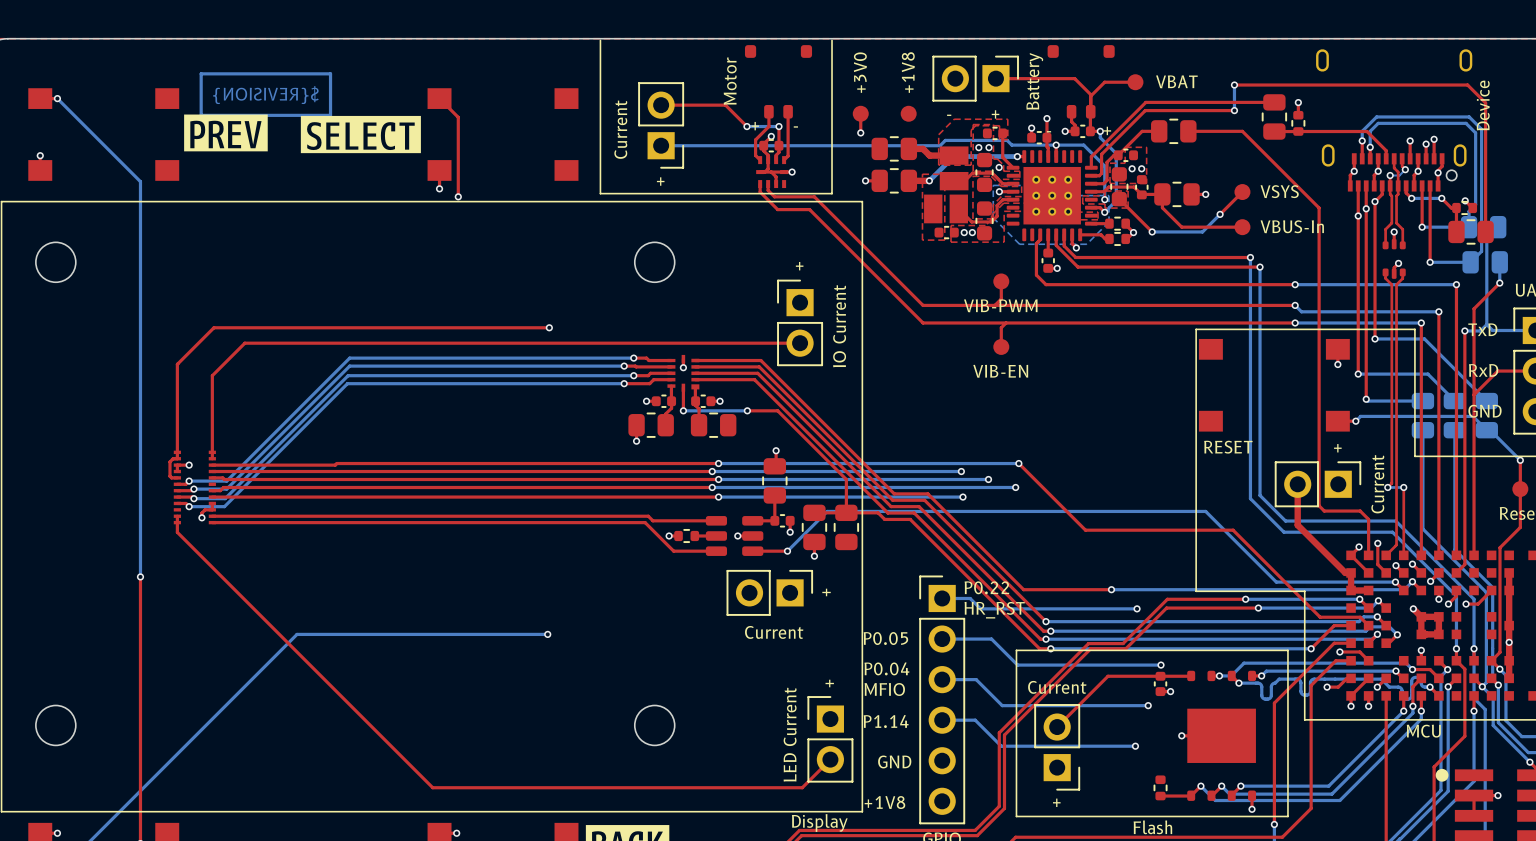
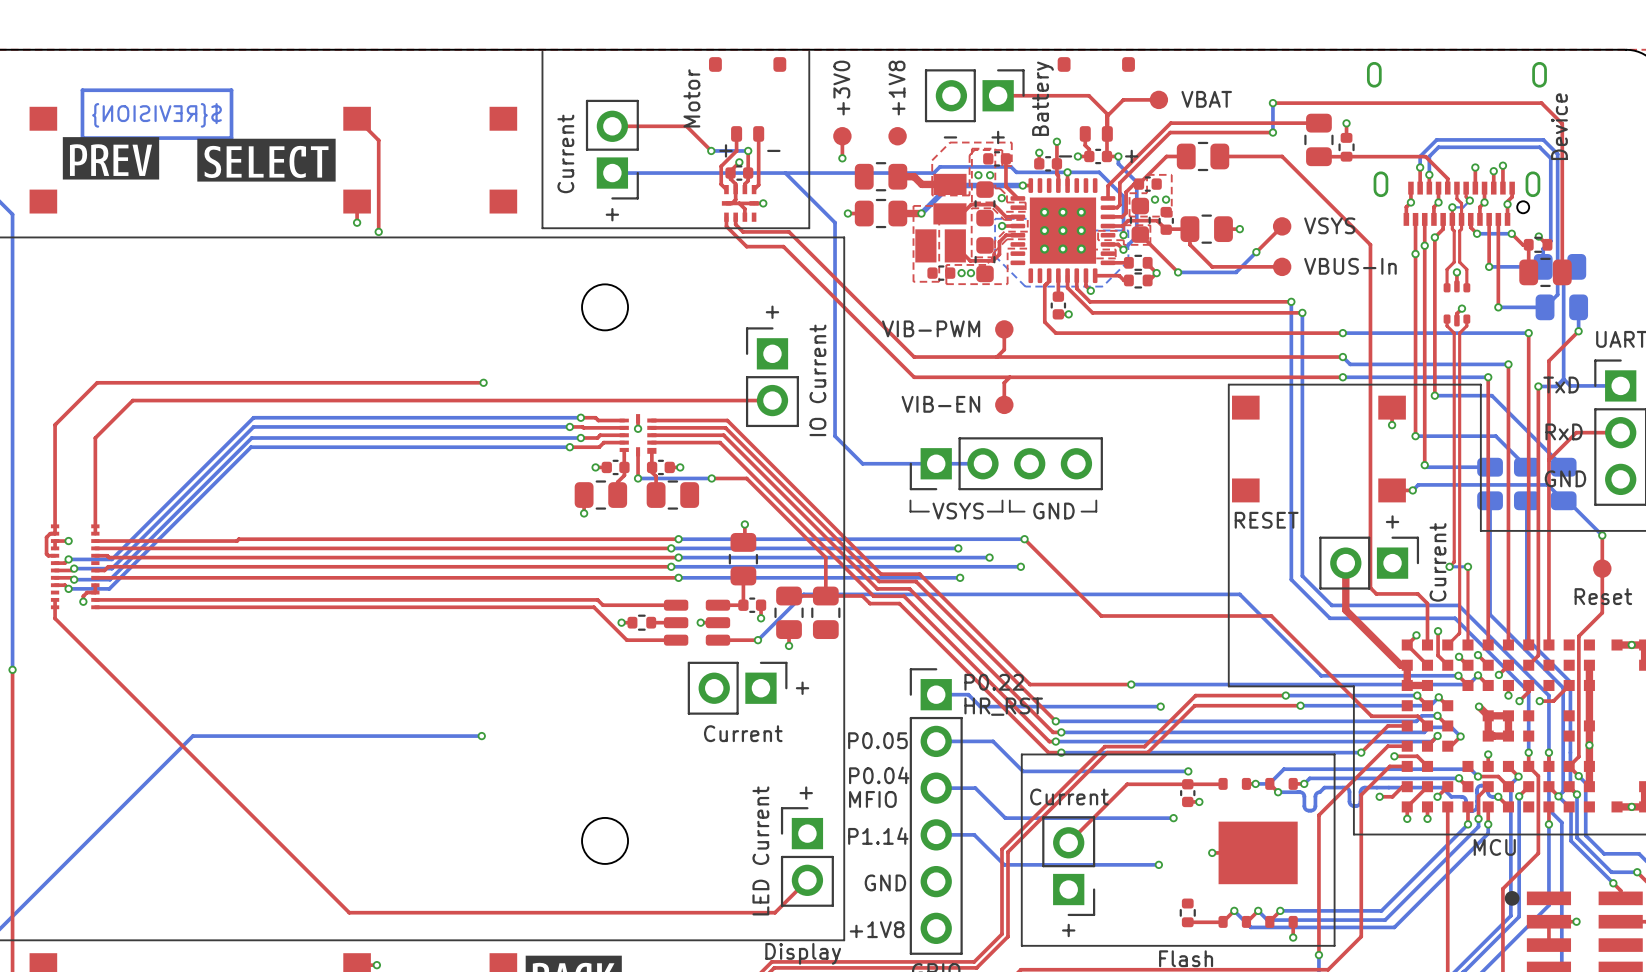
bottom track: none -> (785, 173) (835, 222) (835, 436) (862, 463) (982, 463)
part value position: VIB-PWM (1000, 305) -> VIB-PWM (931, 328)
part value position: VIB-EN (1000, 371) -> VIB-EN (940, 404)
part: none -> (1006, 463)
line: none -> (910, 500) (910, 511) (928, 511)
line: none -> (1002, 500) (1002, 511) (987, 511)
line: none -> (1009, 500) (1009, 511) (1024, 511)
line: none -> (1096, 500) (1096, 511) (1081, 511)
text: none -> VSYS (958, 511)
text: none -> GND (1053, 511)

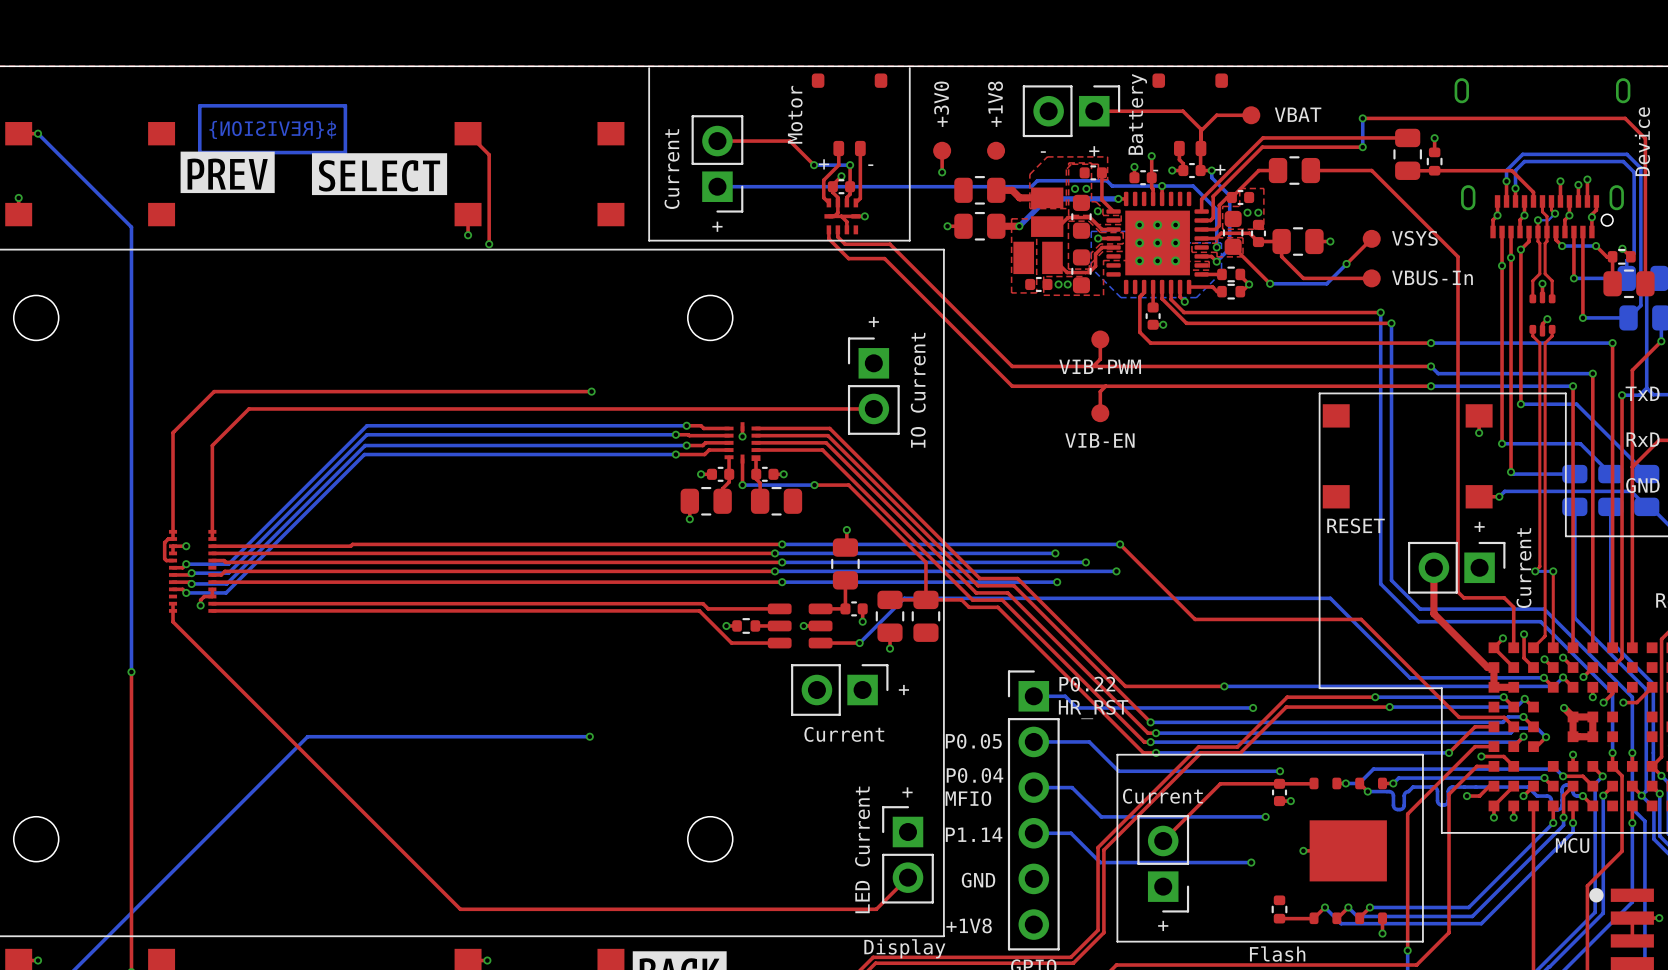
bottom track: (785, 173) (835, 222) (835, 436) (862, 463) (982, 463) -> none
part value position: VIB-PWM (931, 328) -> VIB-PWM (1100, 366)
part value position: VIB-EN (940, 404) -> VIB-EN (1099, 440)
part: (1006, 463) -> none
line: (910, 500) (910, 511) (928, 511) -> none
line: (1002, 500) (1002, 511) (987, 511) -> none
line: (1009, 500) (1009, 511) (1024, 511) -> none
line: (1096, 500) (1096, 511) (1081, 511) -> none
text: VSYS (958, 511) -> none
text: GND (1053, 511) -> none

